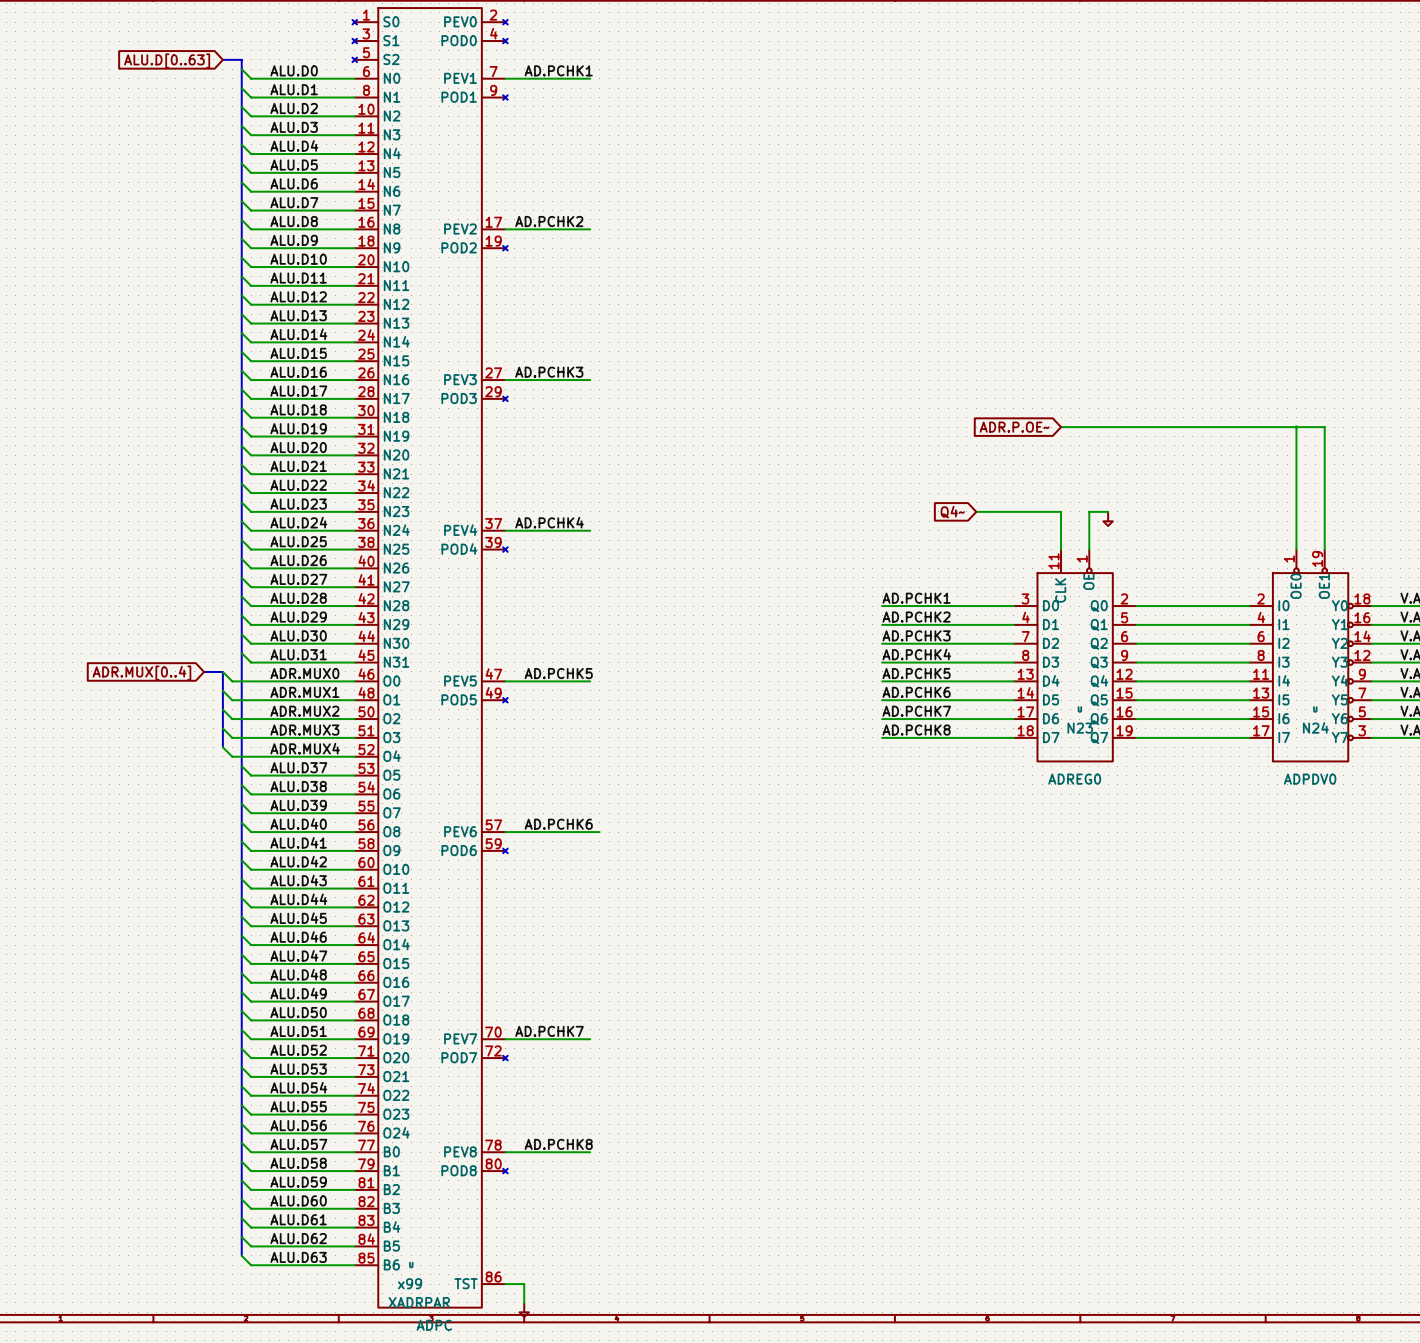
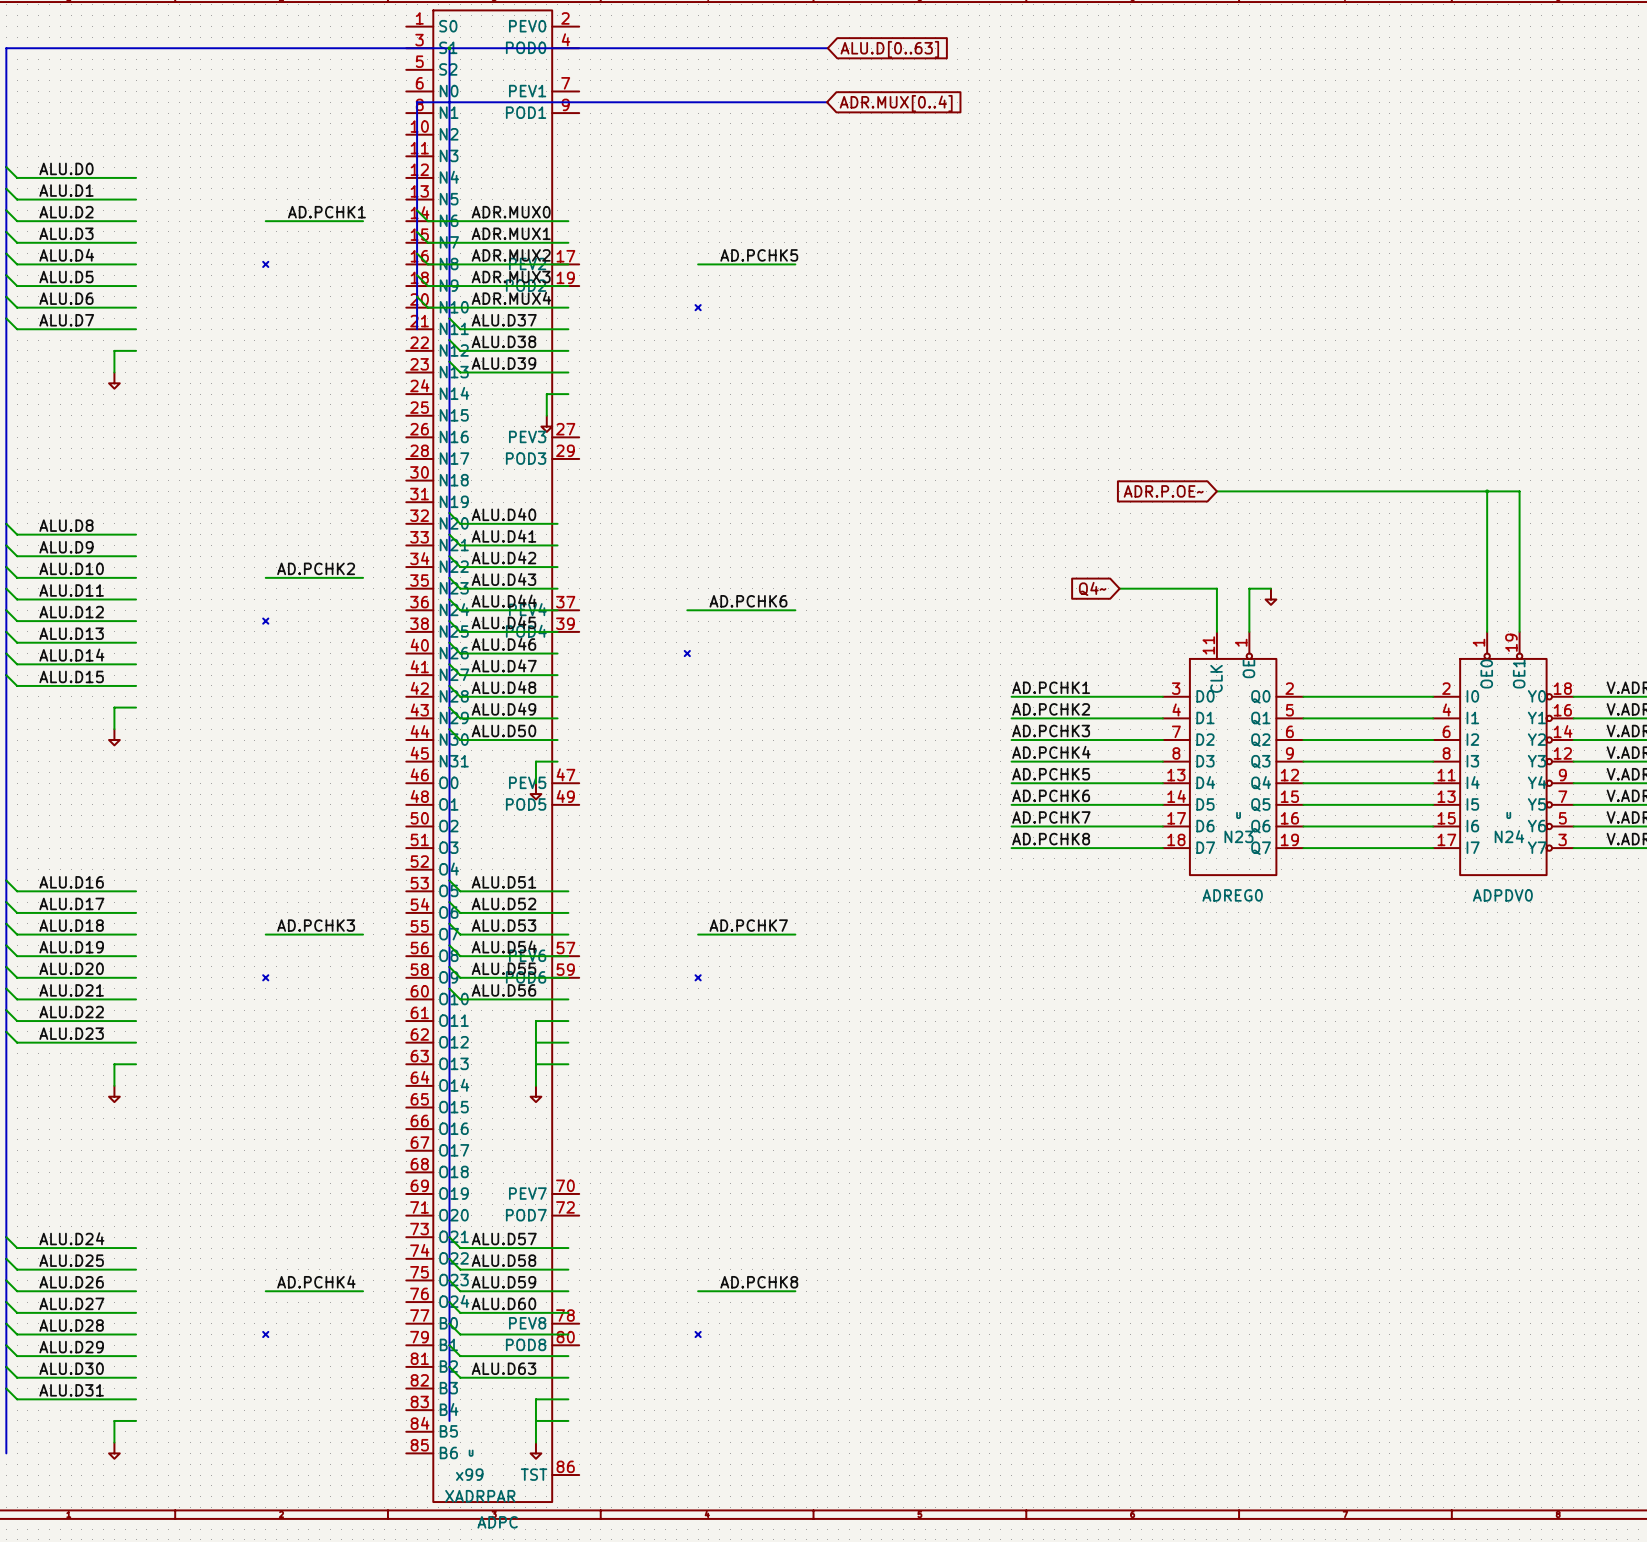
no-connect mark: (354, 22) -> none
no-connect mark: (505, 22) -> none
no-connect mark: (354, 41) -> none
bus: none -> (449, 48) (449, 1420)
junction: none -> (449, 48)
no-connect mark: (505, 41) -> none
bus: none -> (827, 48) (6, 48) (6, 1453)
global label: none -> ALU.D[0..63] (889, 49)
bus: (222, 59) (241, 59) (241, 1255) -> none
no-connect mark: (354, 59) -> none
global label: ALU.D[0..63] (167, 60) -> none
wire: (241, 69) (251, 78) (354, 78) -> none
label: ALU.D0 (294, 70) -> none
label: AD.PCHK1 (558, 70) -> none
wire: (505, 78) (590, 78) -> none
wire: (241, 88) (251, 97) (354, 97) -> none
bus: none -> (827, 102) (417, 102) (417, 329)
label: ALU.D1 (294, 89) -> none
global label: none -> ADR.MUX[0..4] (896, 103)
no-connect mark: (505, 97) -> none
wire: (241, 106) (251, 116) (354, 116) -> none
label: ALU.D2 (294, 108) -> none
wire: (241, 125) (251, 135) (354, 135) -> none
label: ALU.D3 (294, 127) -> none
wire: none -> (6, 167) (17, 177) (136, 177)
wire: (241, 144) (251, 154) (354, 154) -> none
label: ALU.D4 (294, 145) -> none
label: none -> ALU.D0 (66, 168)
wire: none -> (6, 188) (17, 199) (136, 199)
wire: (241, 163) (251, 172) (354, 172) -> none
label: none -> ALU.D1 (66, 190)
label: ALU.D5 (294, 165) -> none
wire: none -> (6, 210) (17, 221) (136, 221)
wire: (241, 182) (251, 191) -> (265, 221) (287, 221)
wire: none -> (417, 210) (427, 221) (568, 221)
label: none -> ALU.D2 (66, 212)
label: none -> AD.PCHK1 (326, 212)
label: ALU.D6 (294, 183) -> none
label: none -> ADR.MUX0 (511, 212)
wire: (317, 191) (354, 191) -> none
wire: none -> (6, 231) (17, 242) (136, 242)
wire: (241, 201) (251, 210) (354, 210) -> none
wire: none -> (417, 231) (427, 242) (568, 242)
label: none -> ALU.D3 (66, 233)
label: ALU.D7 (294, 202) -> none
label: none -> ADR.MUX1 (511, 233)
wire: none -> (6, 253) (17, 264) (136, 264)
wire: (241, 219) (251, 229) (354, 229) -> none
wire: none -> (417, 253) (427, 264) (568, 264)
label: none -> ALU.D4 (66, 255)
label: ALU.D8 (294, 221) -> none
label: none -> ADR.MUX2 (511, 255)
label: AD.PCHK2 (549, 221) -> none
label: none -> AD.PCHK5 (759, 255)
no-connect mark: none -> (265, 264)
wire: (505, 229) (590, 229) -> none
wire: none -> (698, 264) (795, 264)
wire: none -> (6, 275) (17, 286) (136, 286)
wire: (241, 238) (251, 248) (354, 248) -> none
wire: none -> (417, 275) (427, 286) (568, 286)
label: none -> ALU.D5 (66, 277)
label: ALU.D9 (294, 240) -> none
label: none -> ADR.MUX3 (511, 277)
no-connect mark: (505, 248) -> none
wire: none -> (6, 296) (17, 307) (136, 307)
wire: (241, 257) (251, 267) (354, 267) -> none
wire: none -> (417, 296) (427, 307) (568, 307)
label: none -> ADR.MUX4 (511, 298)
label: none -> ALU.D6 (66, 298)
label: ALU.D10 (298, 259) -> none
no-connect mark: none -> (698, 307)
wire: none -> (6, 318) (17, 329) (136, 329)
wire: (241, 276) (251, 285) (354, 285) -> none
wire: none -> (449, 318) (460, 329) (568, 329)
label: none -> ALU.D7 (66, 320)
label: ALU.D11 (298, 278) -> none
label: none -> ALU.D37 (504, 320)
wire: (241, 295) (251, 304) (354, 304) -> none
wire: none -> (449, 340) (460, 350) (568, 350)
label: ALU.D12 (298, 296) -> none
label: none -> ALU.D38 (503, 341)
wire: none -> (136, 350) (114, 350) (114, 372)
wire: (241, 314) (251, 323) (354, 323) -> none
wire: none -> (449, 361) (460, 372) (568, 372)
label: ALU.D13 (298, 315) -> none
label: none -> ALU.D39 (503, 363)
power symbol: none -> (114, 380)
wire: (241, 332) (251, 342) (354, 342) -> none
label: ALU.D14 (298, 334) -> none
wire: none -> (568, 394) (546, 394) (546, 415)
wire: (241, 351) (251, 361) (354, 361) -> none
label: ALU.D15 (298, 353) -> none
power symbol: none -> (546, 424)
wire: (241, 370) (251, 380) (354, 380) -> none
label: ALU.D16 (298, 372) -> none
label: AD.PCHK3 (549, 372) -> none
wire: (505, 380) (590, 380) -> none
wire: (241, 389) (251, 398) (354, 398) -> none
label: ALU.D17 (298, 391) -> none
no-connect mark: (505, 398) -> none
wire: (241, 408) (251, 417) (354, 417) -> none
label: ALU.D18 (298, 409) -> none
wire: (241, 427) (251, 436) (354, 436) -> none
label: ALU.D19 (298, 428) -> none
wire: (241, 445) (251, 455) (354, 455) -> none
wire: none -> (449, 513) (460, 523) (557, 523)
label: ALU.D20 (298, 447) -> none
label: none -> ALU.D40 (503, 514)
wire: none -> (6, 523) (17, 534) (136, 534)
label: none -> ALU.D8 (66, 525)
wire: (241, 464) (251, 474) (354, 474) -> none
wire: none -> (449, 534) (460, 545) (557, 545)
label: ALU.D21 (298, 466) -> none
label: none -> ALU.D41 (503, 536)
wire: none -> (6, 545) (17, 556) (136, 556)
label: none -> ALU.D9 (66, 547)
wire: (241, 483) (251, 493) (354, 493) -> none
wire: none -> (449, 556) (460, 567) (557, 567)
label: none -> ALU.D42 (503, 557)
label: ALU.D22 (298, 485) -> none
wire: none -> (6, 567) (17, 577) (136, 577)
label: none -> ALU.D10 (71, 568)
label: none -> AD.PCHK2 (316, 568)
wire: none -> (265, 577) (363, 577)
wire: (241, 502) (251, 511) (354, 511) -> none
wire: none -> (449, 577) (460, 588) (557, 588)
label: none -> ALU.D43 (503, 579)
label: ALU.D23 (298, 504) -> none
wire: none -> (6, 588) (17, 599) (136, 599)
label: none -> ALU.D11 (71, 590)
wire: (241, 521) (251, 530) (354, 530) -> none
wire: none -> (449, 599) (460, 610) (557, 610)
label: ALU.D24 (298, 522) -> none
label: none -> ALU.D44 (504, 601)
label: AD.PCHK4 (549, 522) -> none
label: none -> AD.PCHK6 (748, 601)
wire: none -> (6, 610) (17, 621) (136, 621)
wire: (505, 530) (590, 530) -> none
wire: none -> (687, 610) (795, 610)
label: none -> ALU.D12 (71, 612)
no-connect mark: none -> (265, 621)
wire: (241, 540) (251, 549) (354, 549) -> none
wire: none -> (449, 621) (460, 631) (557, 631)
label: ALU.D25 (298, 541) -> none
label: none -> ALU.D45 (503, 622)
wire: none -> (6, 631) (17, 642) (136, 642)
no-connect mark: (505, 549) -> none
label: none -> ALU.D13 (71, 633)
wire: (241, 558) (251, 568) (354, 568) -> none
wire: none -> (449, 642) (460, 653) (557, 653)
label: ALU.D26 (298, 560) -> none
label: none -> ALU.D46 (503, 644)
wire: none -> (6, 653) (17, 664) (136, 664)
no-connect mark: none -> (687, 653)
label: none -> ALU.D14 (71, 655)
wire: (241, 577) (251, 587) (354, 587) -> none
wire: none -> (449, 664) (460, 675) (557, 675)
label: ALU.D27 (298, 579) -> none
label: none -> ALU.D47 (504, 665)
wire: none -> (6, 675) (17, 685) (136, 685)
label: none -> ALU.D15 (71, 676)
wire: (241, 596) (251, 606) (354, 606) -> none
wire: none -> (449, 685) (460, 696) (557, 696)
label: none -> ALU.D48 (503, 687)
label: ALU.D28 (298, 598) -> none
wire: none -> (136, 707) (114, 707) (114, 729)
wire: (241, 615) (251, 624) (354, 624) -> none
wire: none -> (449, 707) (460, 718) (557, 718)
label: none -> ALU.D49 (503, 709)
label: ALU.D29 (298, 617) -> none
wire: (241, 634) (251, 643) (354, 643) -> none
wire: none -> (449, 729) (460, 740) (557, 740)
label: ALU.D30 (298, 635) -> none
label: none -> ALU.D50 (503, 731)
power symbol: none -> (114, 737)
wire: (241, 653) (251, 662) (354, 662) -> none
label: ALU.D31 (298, 654) -> none
wire: none -> (557, 761) (535, 761) (535, 783)
bus: (204, 671) (222, 671) (222, 747) -> none
wire: (222, 671) (232, 681) (354, 681) -> none
global label: ADR.MUX[0..4] (141, 673) -> none
label: ADR.MUX0 (304, 673) -> none
label: AD.PCHK5 (558, 673) -> none
wire: (505, 681) (590, 681) -> none
power symbol: none -> (535, 791)
wire: (222, 690) (232, 700) (354, 700) -> none
label: ADR.MUX1 (304, 692) -> none
no-connect mark: (505, 700) -> none
wire: (222, 709) (232, 719) (354, 719) -> none
label: ADR.MUX2 (304, 711) -> none
wire: (222, 728) (232, 737) (354, 737) -> none
label: ADR.MUX3 (304, 730) -> none
wire: (222, 747) (232, 756) (354, 756) -> none
label: ADR.MUX4 (305, 748) -> none
wire: none -> (6, 880) (17, 891) (136, 891)
wire: (241, 766) (251, 775) (354, 775) -> none
wire: none -> (449, 880) (460, 891) (568, 891)
label: none -> ALU.D16 (71, 882)
label: ALU.D37 (298, 767) -> none
label: none -> ALU.D51 (503, 882)
wire: none -> (6, 902) (17, 912) (136, 912)
wire: (241, 784) (251, 794) (354, 794) -> none
wire: none -> (449, 902) (460, 912) (568, 912)
label: none -> ALU.D17 (71, 903)
label: ALU.D38 (298, 786) -> none
label: none -> ALU.D52 (503, 903)
wire: none -> (6, 923) (17, 934) (136, 934)
wire: (241, 803) (251, 813) -> (265, 934) (287, 934)
wire: none -> (449, 923) (460, 934) (568, 934)
label: none -> ALU.D18 (71, 925)
label: none -> AD.PCHK3 (316, 925)
label: ALU.D39 (298, 805) -> none
label: none -> ALU.D53 (503, 925)
label: none -> AD.PCHK7 (748, 925)
wire: (317, 813) (354, 813) -> none
wire: none -> (698, 934) (795, 934)
wire: none -> (6, 945) (17, 956) (136, 956)
wire: (241, 822) (251, 832) (354, 832) -> none
wire: none -> (449, 945) (460, 956) (568, 956)
label: none -> ALU.D19 (71, 947)
label: ALU.D40 (298, 824) -> none
label: none -> ALU.D54 (504, 946)
label: AD.PCHK6 (558, 824) -> none
wire: (505, 832) (599, 832) -> none
wire: none -> (6, 966) (17, 977) (136, 977)
wire: (241, 841) (251, 850) (354, 850) -> none
wire: none -> (449, 966) (460, 977) (568, 977)
label: ALU.D41 (298, 842) -> none
label: none -> ALU.D20 (71, 968)
label: none -> ALU.D55 (503, 968)
no-connect mark: none -> (265, 977)
no-connect mark: (505, 850) -> none
no-connect mark: none -> (698, 977)
wire: none -> (6, 988) (17, 999) (136, 999)
wire: (241, 860) (251, 869) (354, 869) -> none
wire: none -> (449, 988) (460, 999) (568, 999)
label: none -> ALU.D21 (71, 990)
label: ALU.D42 (298, 861) -> none
label: none -> ALU.D56 (503, 990)
wire: none -> (6, 1010) (17, 1021) (136, 1021)
wire: (241, 879) (251, 888) (354, 888) -> none
label: none -> ALU.D22 (71, 1012)
label: ALU.D43 (298, 880) -> none
wire: none -> (568, 1021) (535, 1021) (535, 1085)
wire: none -> (6, 1031) (17, 1042) (136, 1042)
wire: (241, 897) (251, 907) (354, 907) -> none
label: none -> ALU.D23 (71, 1033)
label: ALU.D44 (298, 899) -> none
wire: none -> (535, 1042) (568, 1042)
wire: (241, 916) (251, 926) (354, 926) -> none
label: ALU.D45 (298, 918) -> none
wire: none -> (136, 1064) (114, 1064) (114, 1085)
wire: none -> (535, 1064) (568, 1064)
wire: (241, 935) (251, 945) (354, 945) -> none
label: ALU.D46 (298, 937) -> none
power symbol: none -> (114, 1094)
power symbol: none -> (535, 1094)
wire: (241, 954) (251, 963) (354, 963) -> none
label: ALU.D47 (298, 955) -> none
wire: (241, 973) (251, 982) (354, 982) -> none
label: ALU.D48 (298, 974) -> none
wire: (241, 992) (251, 1001) (354, 1001) -> none
label: ALU.D49 (298, 993) -> none
wire: (241, 1010) (251, 1020) (354, 1020) -> none
label: ALU.D50 (298, 1012) -> none
wire: (241, 1029) (251, 1039) (354, 1039) -> none
label: ALU.D51 (298, 1031) -> none
label: AD.PCHK7 (549, 1031) -> none
wire: (505, 1039) (590, 1039) -> none
wire: (241, 1048) (251, 1058) (354, 1058) -> none
label: ALU.D52 (298, 1050) -> none
no-connect mark: (505, 1058) -> none
wire: (241, 1067) (251, 1076) (354, 1076) -> none
label: ALU.D53 (298, 1069) -> none
wire: none -> (6, 1237) (17, 1248) (136, 1248)
wire: none -> (449, 1237) (460, 1248) (568, 1248)
label: none -> ALU.D24 (71, 1238)
label: none -> ALU.D57 (504, 1239)
wire: (241, 1086) (251, 1095) (354, 1095) -> none
label: ALU.D54 (298, 1087) -> none
wire: none -> (6, 1258) (17, 1269) (136, 1269)
wire: none -> (449, 1258) (460, 1269) (568, 1269)
label: none -> ALU.D25 (71, 1260)
label: none -> ALU.D58 (503, 1260)
wire: (241, 1105) (251, 1114) (354, 1114) -> none
label: ALU.D55 (298, 1106) -> none
wire: none -> (6, 1280) (17, 1291) (136, 1291)
wire: none -> (449, 1280) (460, 1291) (568, 1291)
label: none -> AD.PCHK4 (316, 1282)
label: none -> ALU.D26 (71, 1282)
label: none -> ALU.D59 (503, 1282)
label: none -> AD.PCHK8 (759, 1282)
wire: none -> (265, 1291) (363, 1291)
wire: (241, 1124) (251, 1133) (354, 1133) -> none
wire: none -> (698, 1291) (795, 1291)
label: ALU.D56 (298, 1125) -> none
wire: none -> (6, 1302) (17, 1312) (136, 1312)
wire: none -> (449, 1302) (460, 1312) (568, 1312)
label: none -> ALU.D27 (71, 1303)
label: none -> ALU.D60 (503, 1303)
wire: (241, 1142) (251, 1152) (354, 1152) -> none
label: ALU.D57 (298, 1144) -> none
label: AD.PCHK8 (558, 1144) -> none
wire: none -> (6, 1323) (17, 1334) (136, 1334)
wire: none -> (449, 1323) (460, 1334) (568, 1334)
wire: (505, 1152) (590, 1152) -> none
label: none -> ALU.D28 (71, 1325)
no-connect mark: none -> (265, 1334)
wire: (241, 1161) (251, 1171) (354, 1171) -> none
no-connect mark: none -> (698, 1334)
label: ALU.D58 (298, 1163) -> none
wire: none -> (6, 1345) (17, 1356) (136, 1356)
wire: none -> (449, 1345) (460, 1356) (568, 1356)
no-connect mark: (505, 1171) -> none
label: none -> ALU.D29 (71, 1347)
wire: (241, 1180) (251, 1189) (354, 1189) -> none
label: ALU.D59 (298, 1182) -> none
wire: none -> (6, 1366) (17, 1377) (136, 1377)
wire: none -> (449, 1366) (460, 1377) (568, 1377)
label: none -> ALU.D30 (71, 1368)
label: none -> ALU.D63 (503, 1368)
wire: (241, 1199) (251, 1208) (354, 1208) -> none
label: ALU.D60 (298, 1200) -> none
wire: none -> (6, 1388) (17, 1399) (136, 1399)
label: none -> ALU.D31 (71, 1390)
wire: (241, 1218) (251, 1227) (354, 1227) -> none
wire: none -> (568, 1399) (535, 1399) (535, 1442)
label: ALU.D61 (298, 1219) -> none
wire: none -> (136, 1420) (114, 1420) (114, 1442)
wire: (241, 1237) (251, 1246) (354, 1246) -> none
wire: none -> (535, 1420) (568, 1420)
label: ALU.D62 (298, 1238) -> none
wire: (241, 1255) (251, 1265) (354, 1265) -> none
label: ALU.D63 (298, 1257) -> none
power symbol: none -> (114, 1450)
wire: (505, 1284) (524, 1284) (524, 1302) -> none
power symbol position: (524, 1310) -> (535, 1450)

